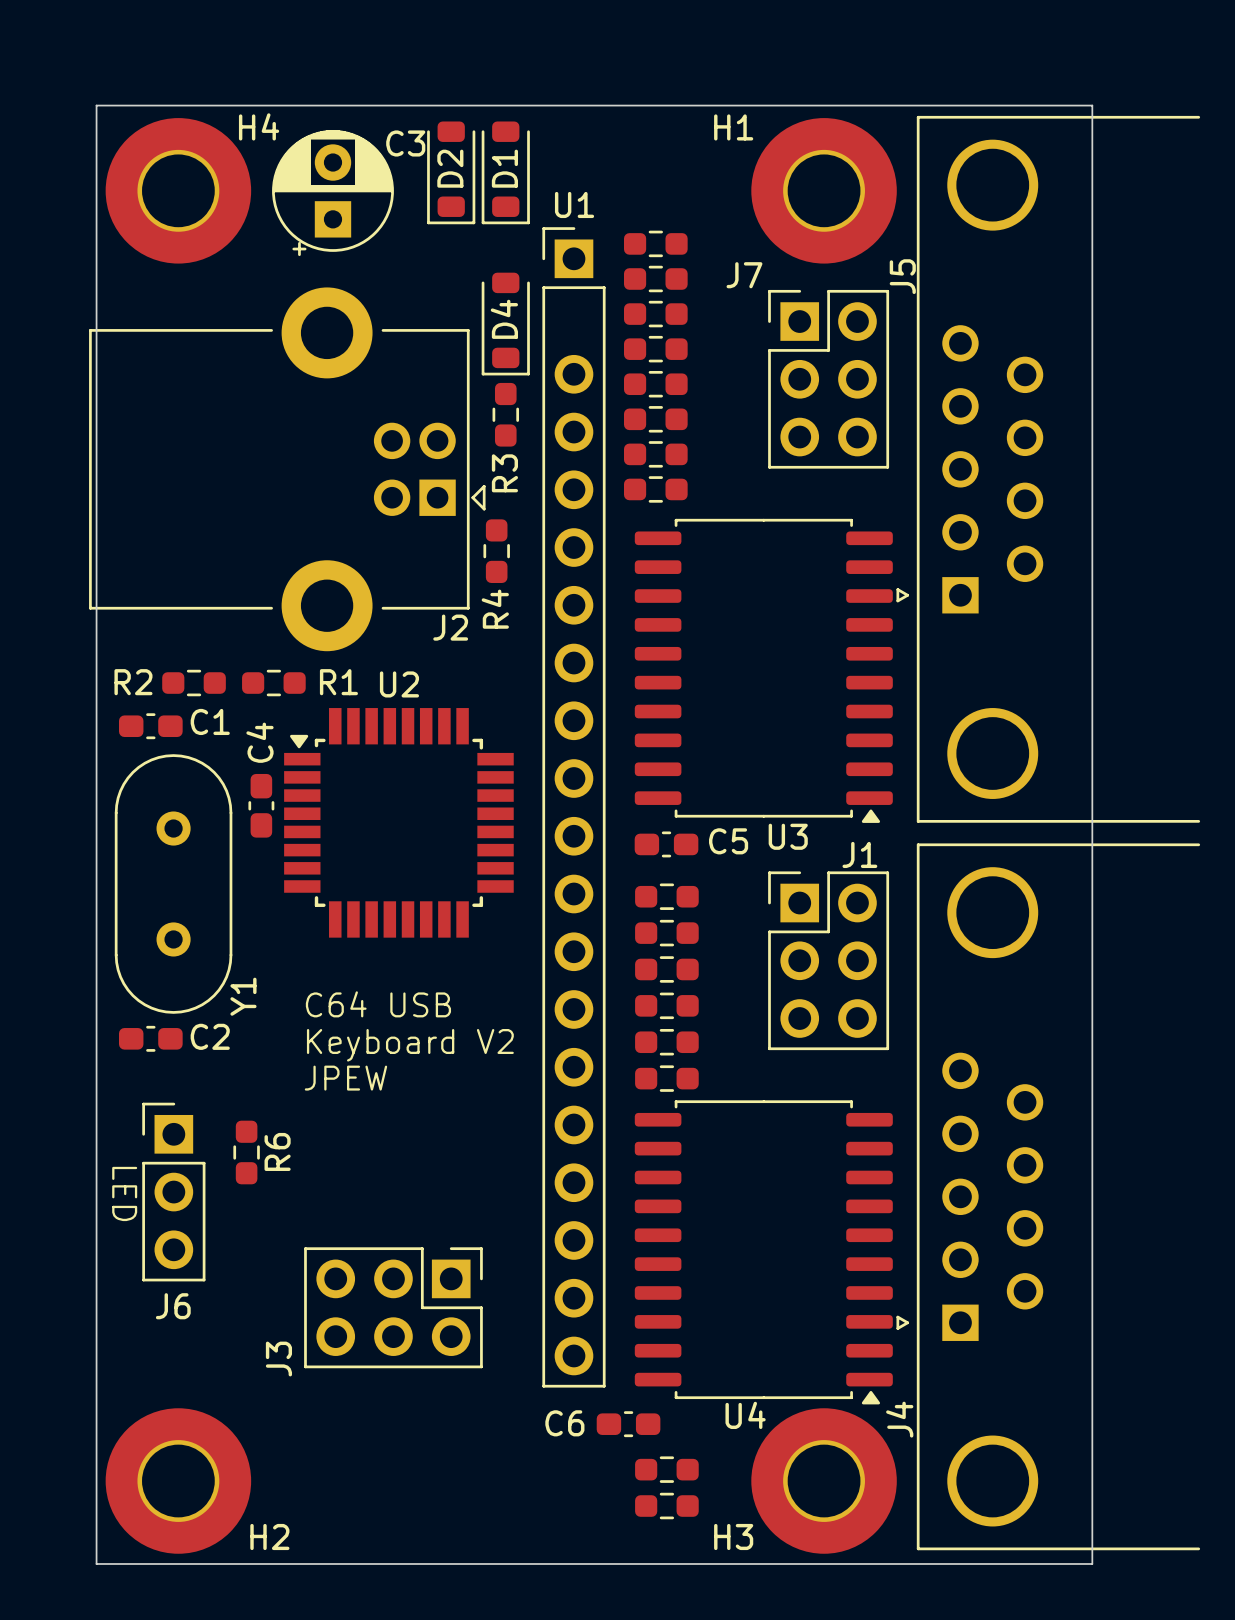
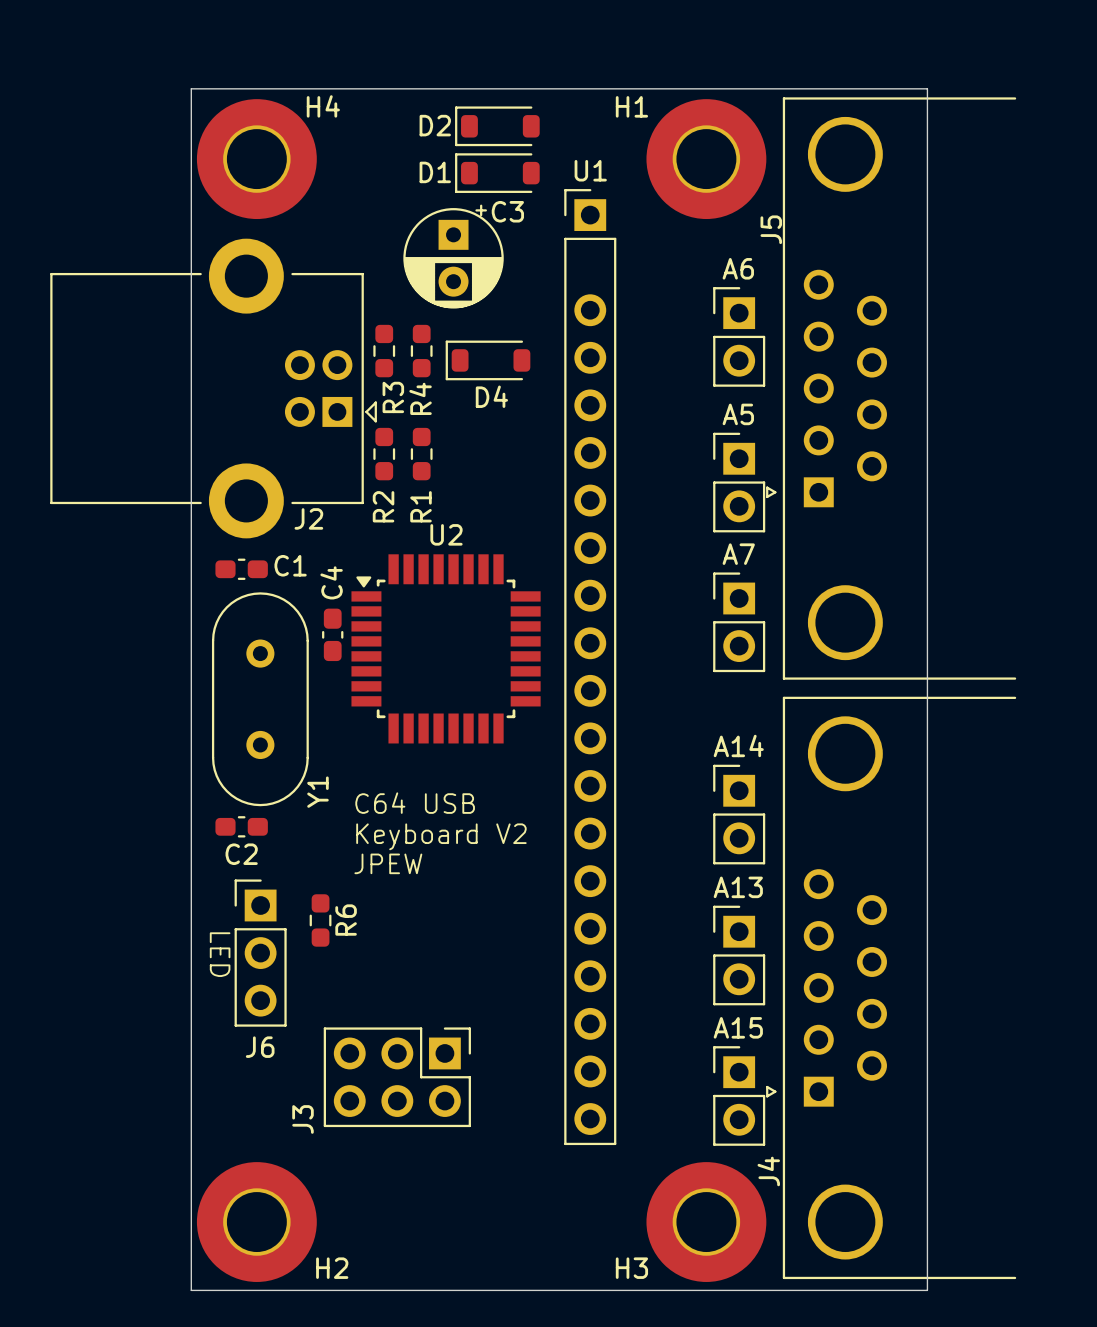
board edge: (198, 105) (96, 105) (96, 1563) (198, 1563) -> (191, 88) (191, 1290)
D2 name position: D2 (450, 168) -> D2 (435, 125)
D1 name position: D1 (504, 168) -> D1 (435, 172)
D2 rotation: 0° (451, 172) -> 90° clockwise (497, 126)
D2 position: (451, 172) -> (497, 126)
D1 rotation: 0° (505, 172) -> 90° clockwise (497, 173)
D1 position: (505, 172) -> (497, 173)
H4 position: (178, 190) -> (256, 159)
C3 rotation: 0° (332, 193) -> 180° (453, 256)
C3 position: (332, 193) -> (453, 256)
part: (655, 243) -> none
part: (655, 279) -> none
part: (655, 314) -> none
D4 rotation: 0° (505, 324) -> 90° clockwise (488, 360)
D4 position: (505, 324) -> (488, 360)
part: (655, 349) -> none
J7: (828, 379) -> none
part: (655, 384) -> none
A6: none -> (739, 336)
R3 position: (505, 414) -> (384, 351)
part: (655, 419) -> none
part: (655, 454) -> none
J2 position: (287, 469) -> (213, 388)
R3 name position: R3 (504, 473) -> R3 (393, 397)
part: (655, 489) -> none
R4 position: (496, 551) -> (421, 351)
A5: none -> (739, 482)
J2 name position: J2 (450, 627) -> J2 (308, 518)
U3: (763, 670) -> none
R2 name position: R2 (133, 682) -> R2 (383, 506)
R2 rotation: 0° (194, 683) -> 90° clockwise (384, 454)
R2 position: (194, 683) -> (384, 454)
R1 rotation: 0° (273, 683) -> 90° clockwise (421, 454)
R1 position: (273, 683) -> (421, 454)
C1 position: (150, 726) -> (241, 569)
A7: none -> (739, 622)
C4 position: (261, 805) -> (332, 634)
U1 position: (573, 807) -> (590, 667)
U2 position: (398, 822) -> (446, 648)
C5: (666, 844) -> none
Y1 position: (173, 884) -> (260, 699)
part: (666, 896) -> none
part: (666, 933) -> none
J1: (828, 960) -> none
part: (666, 969) -> none
A14: none -> (739, 814)
text position: C64 USB (378, 1004) -> C64 USB (415, 803)
part: (666, 1005) -> none
C2 name position: C2 (210, 1036) -> C2 (241, 854)
C2 position: (150, 1038) -> (241, 826)
part: (666, 1042) -> none
text position: Keyboard V2 (410, 1045) -> Keyboard V2 (441, 836)
text position: JPEW (345, 1078) -> JPEW (388, 863)
part: (666, 1078) -> none
R6 position: (246, 1152) -> (320, 920)
A13: none -> (739, 955)
J6 position: (173, 1192) -> (260, 953)
text position: LED (124, 1193) -> LED (220, 954)
U4: (763, 1252) -> none
J3 position: (393, 1307) -> (397, 1077)
A15: none -> (739, 1095)
C6: (628, 1424) -> none
part: (666, 1469) -> none
H2 position: (178, 1481) -> (256, 1222)
part: (666, 1506) -> none

